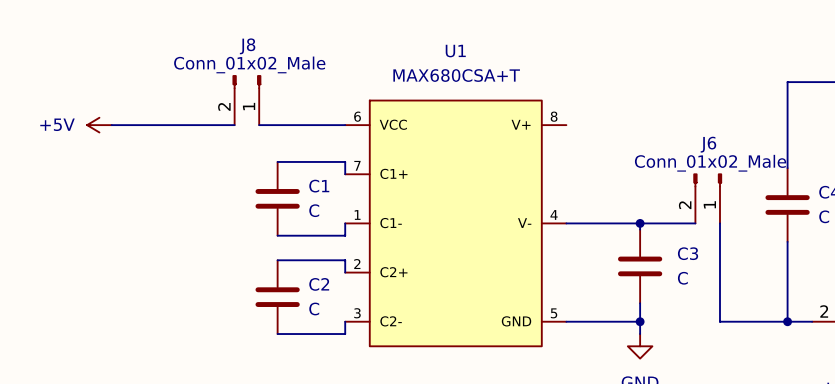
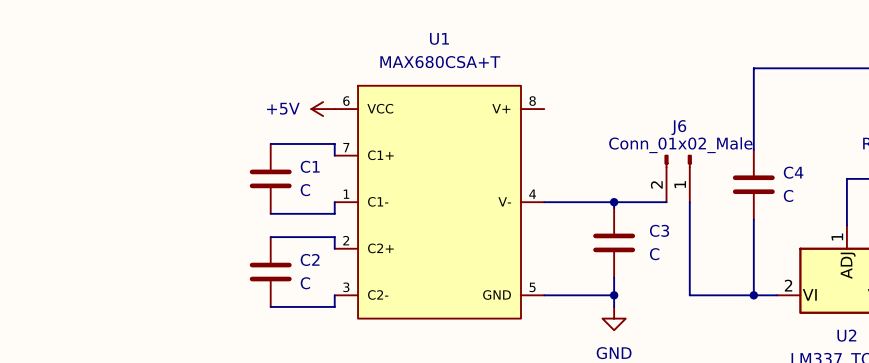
J8: Conn_01x02_Male (246, 100) -> none
power symbol position: +5V (99, 125) -> +5V (323, 109)
wire: (111, 125) (234, 125) -> none
wire: (259, 125) (345, 125) -> none

